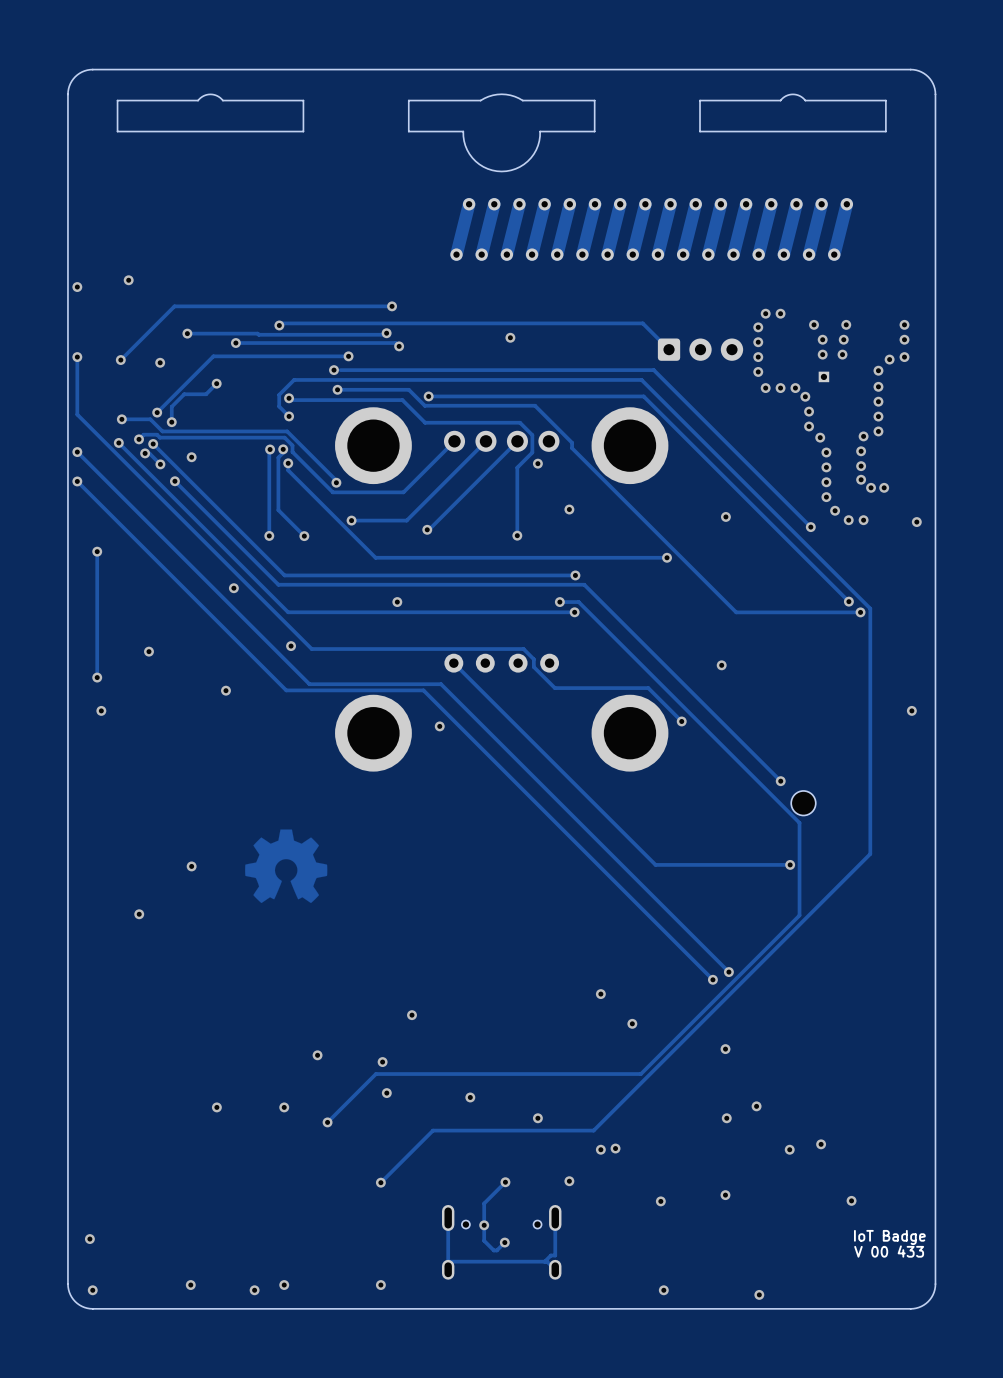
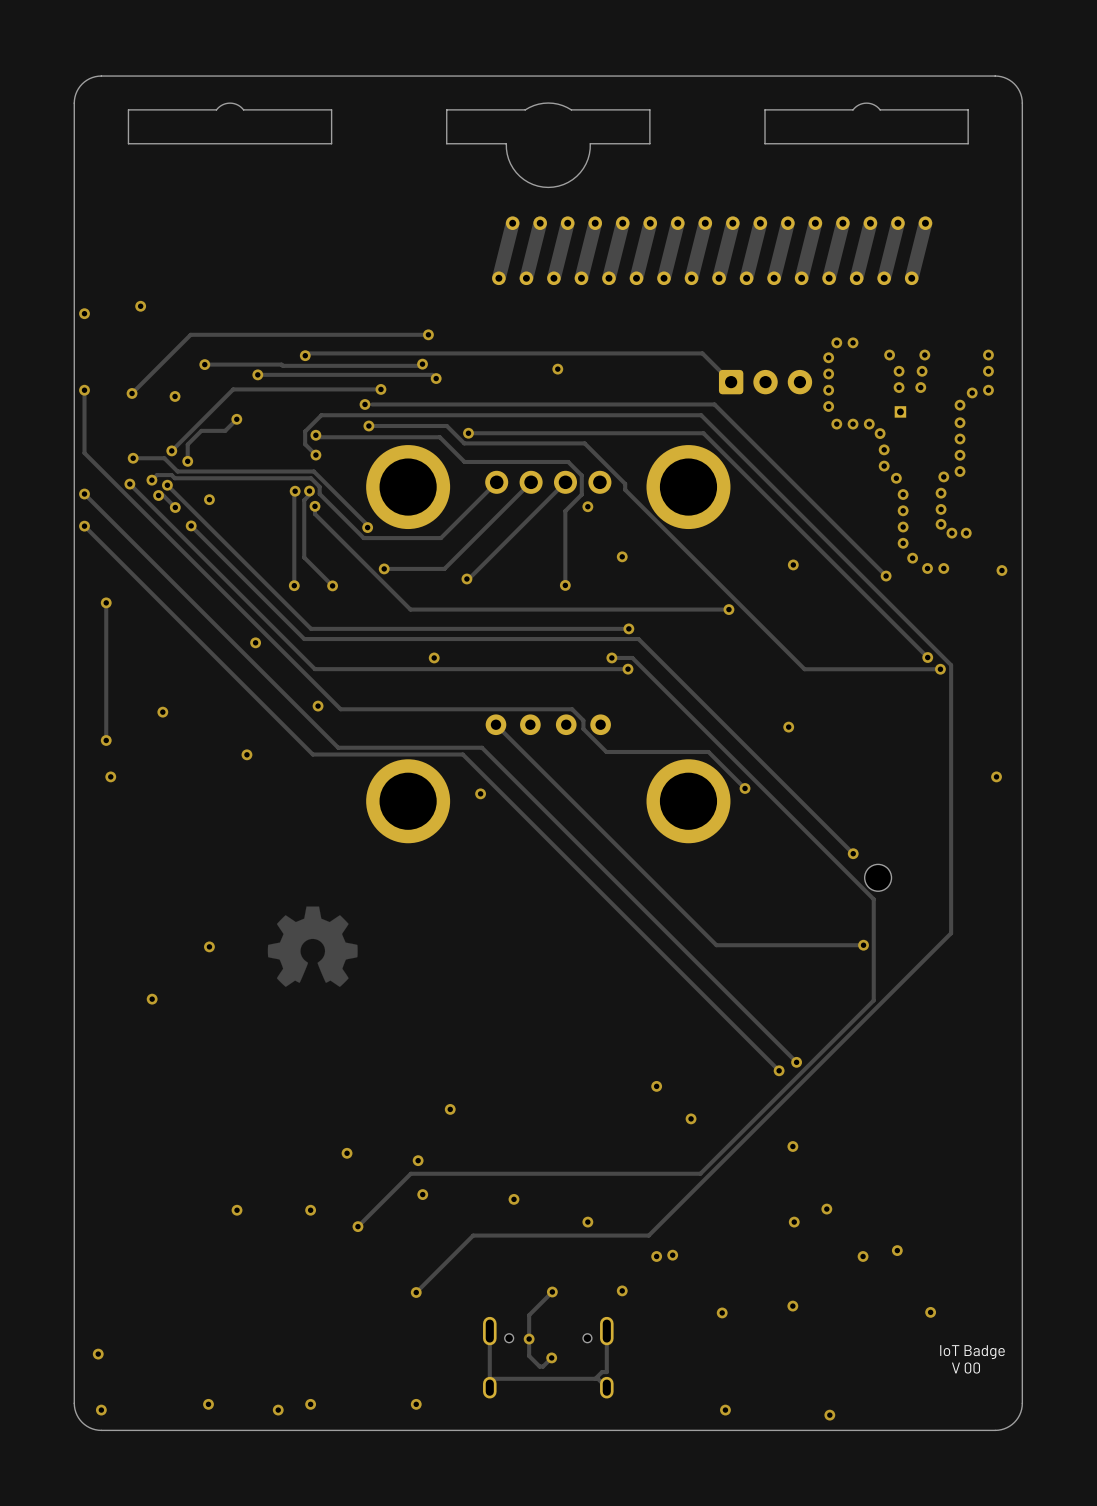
text: V 00 433 (889, 1251) -> V 00 (965, 1368)

